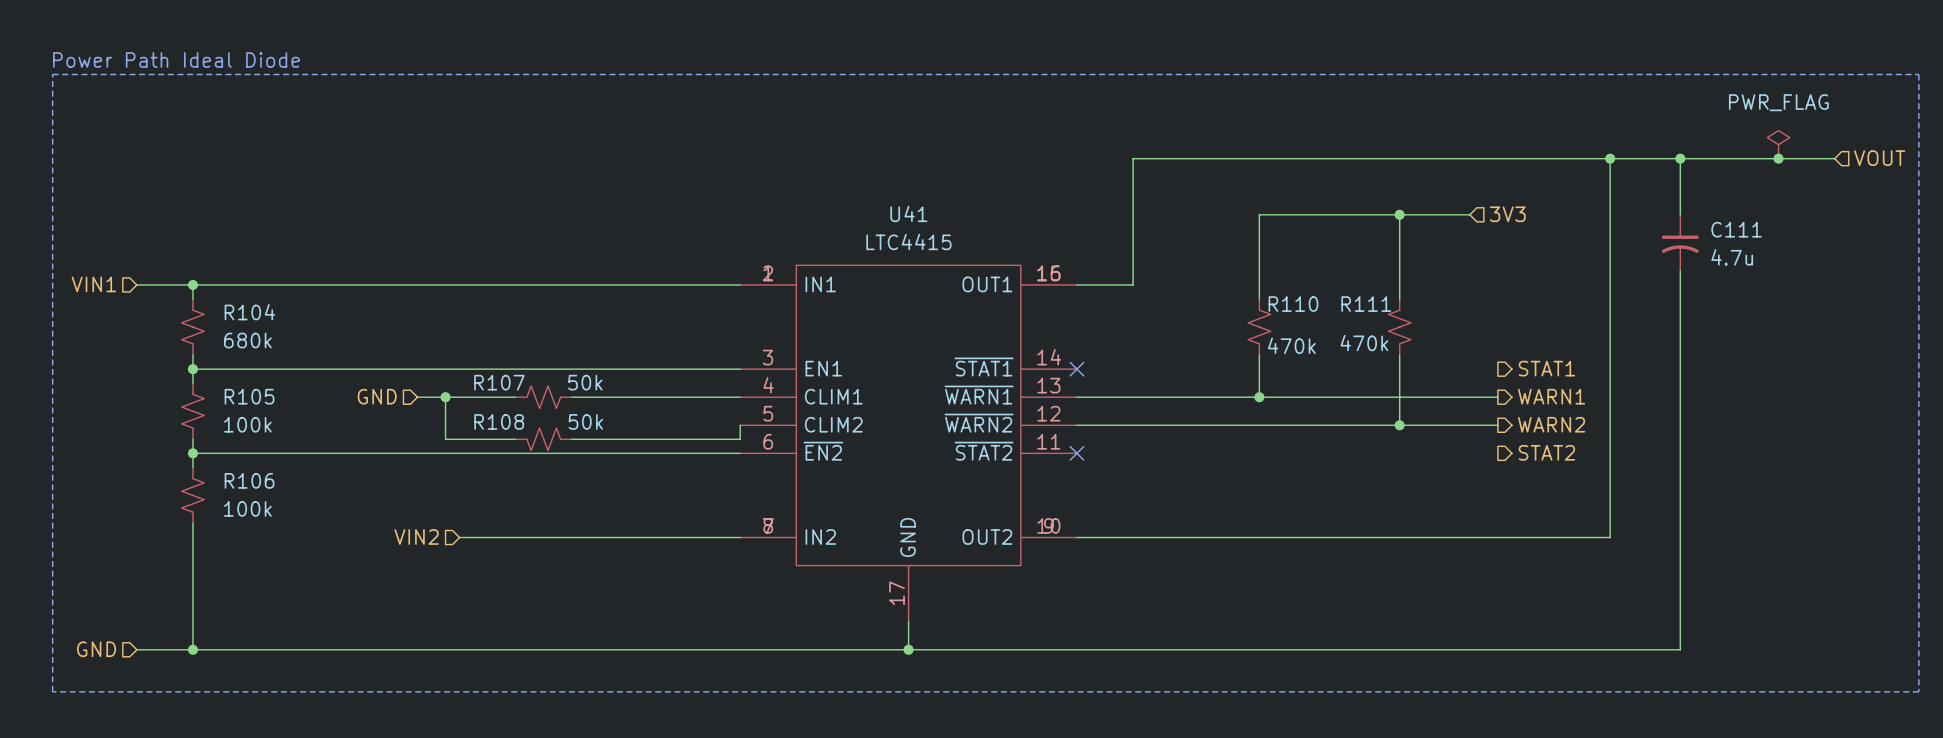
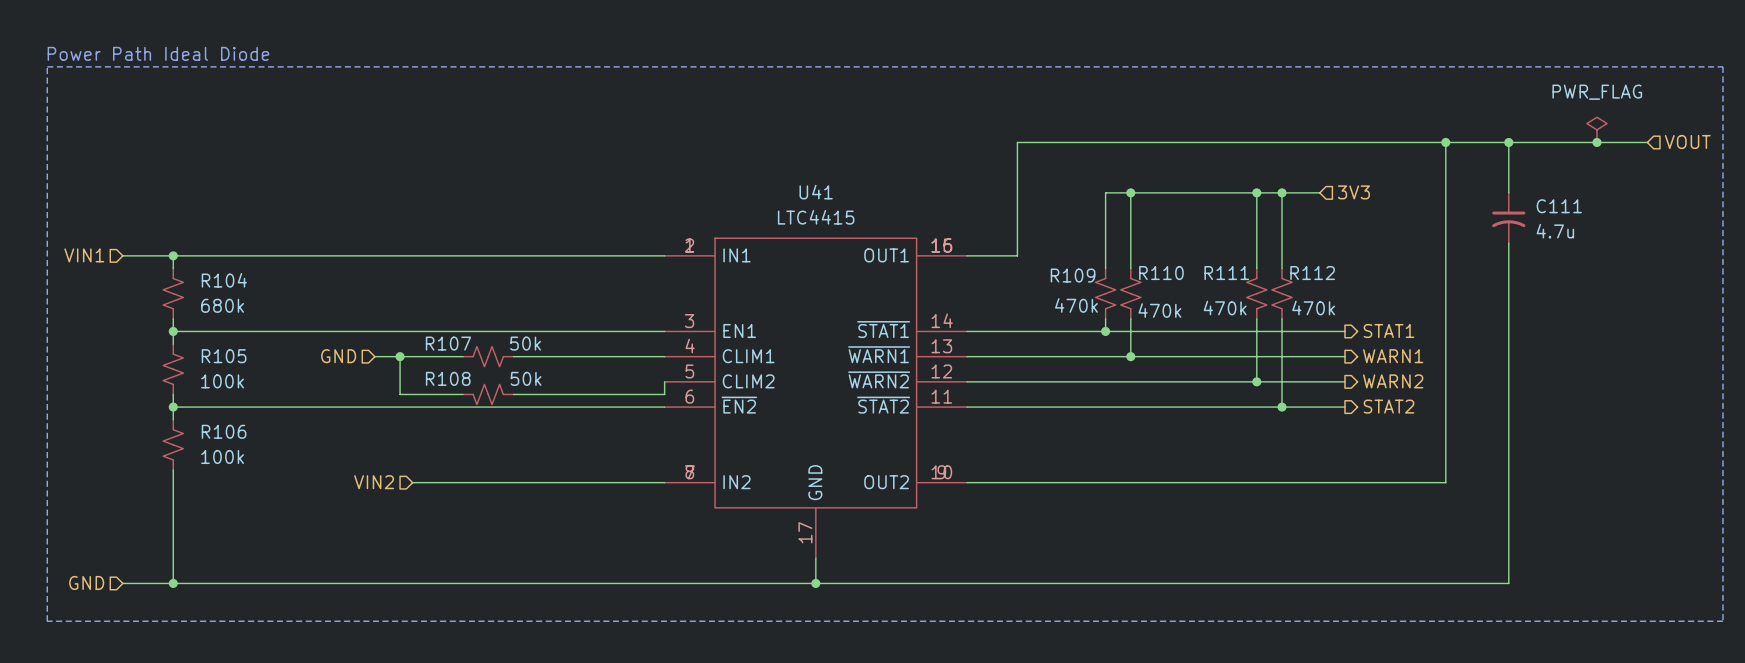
wire: none -> (1130, 192) (1105, 192) (1105, 268)
junction: none -> (1130, 192)
wire: none -> (1282, 192) (1282, 268)
junction: none -> (1282, 192)
R109: none -> 470k (1105, 293)
R112: none -> 470k (1282, 293)
wire: none -> (1105, 318) (1105, 331)
wire: none -> (1282, 318) (1282, 407)
wire: none -> (967, 331) (1344, 331)
no-connect mark: (1076, 369) -> none
junction: none -> (1105, 331)
wire: none -> (967, 407) (1344, 407)
no-connect mark: (1076, 453) -> none
junction: none -> (1282, 407)

